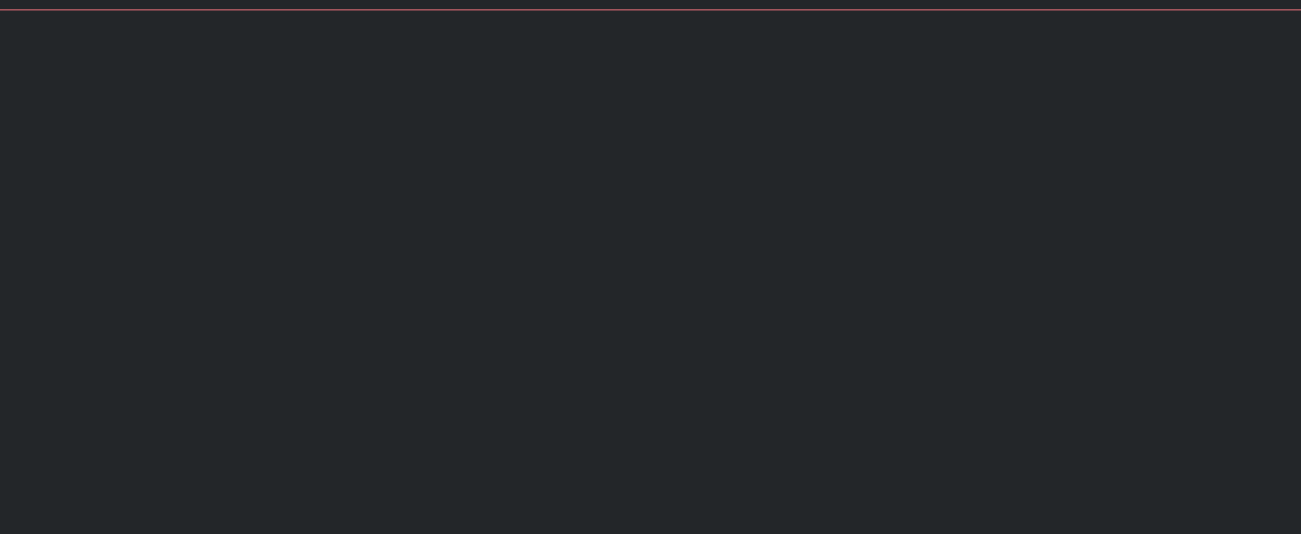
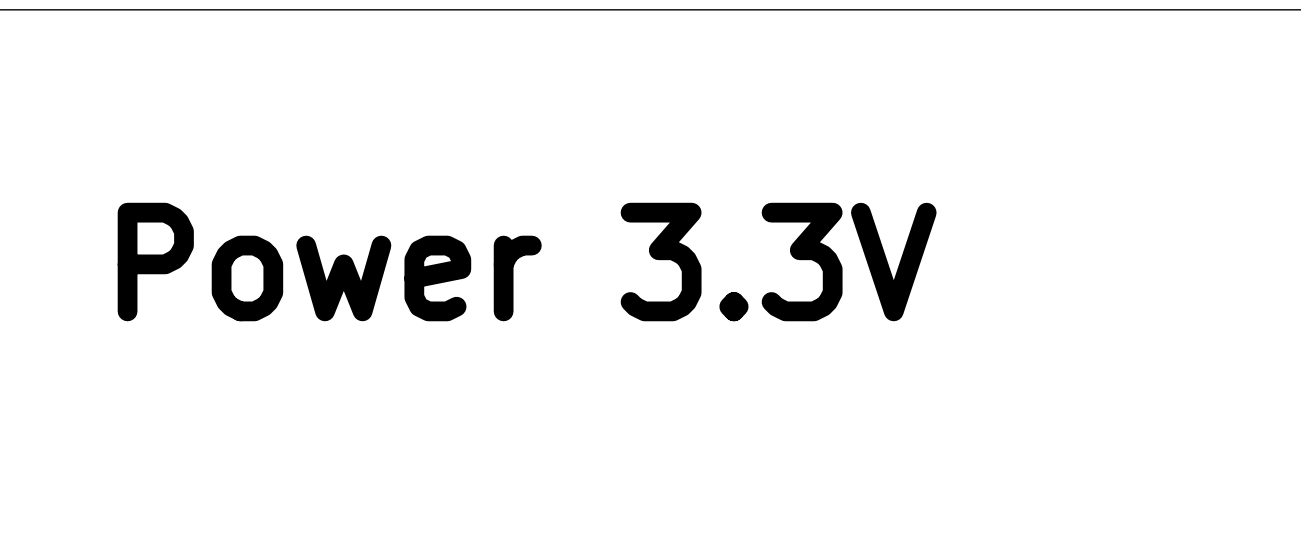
text: none -> Power 3.3V (527, 262)

